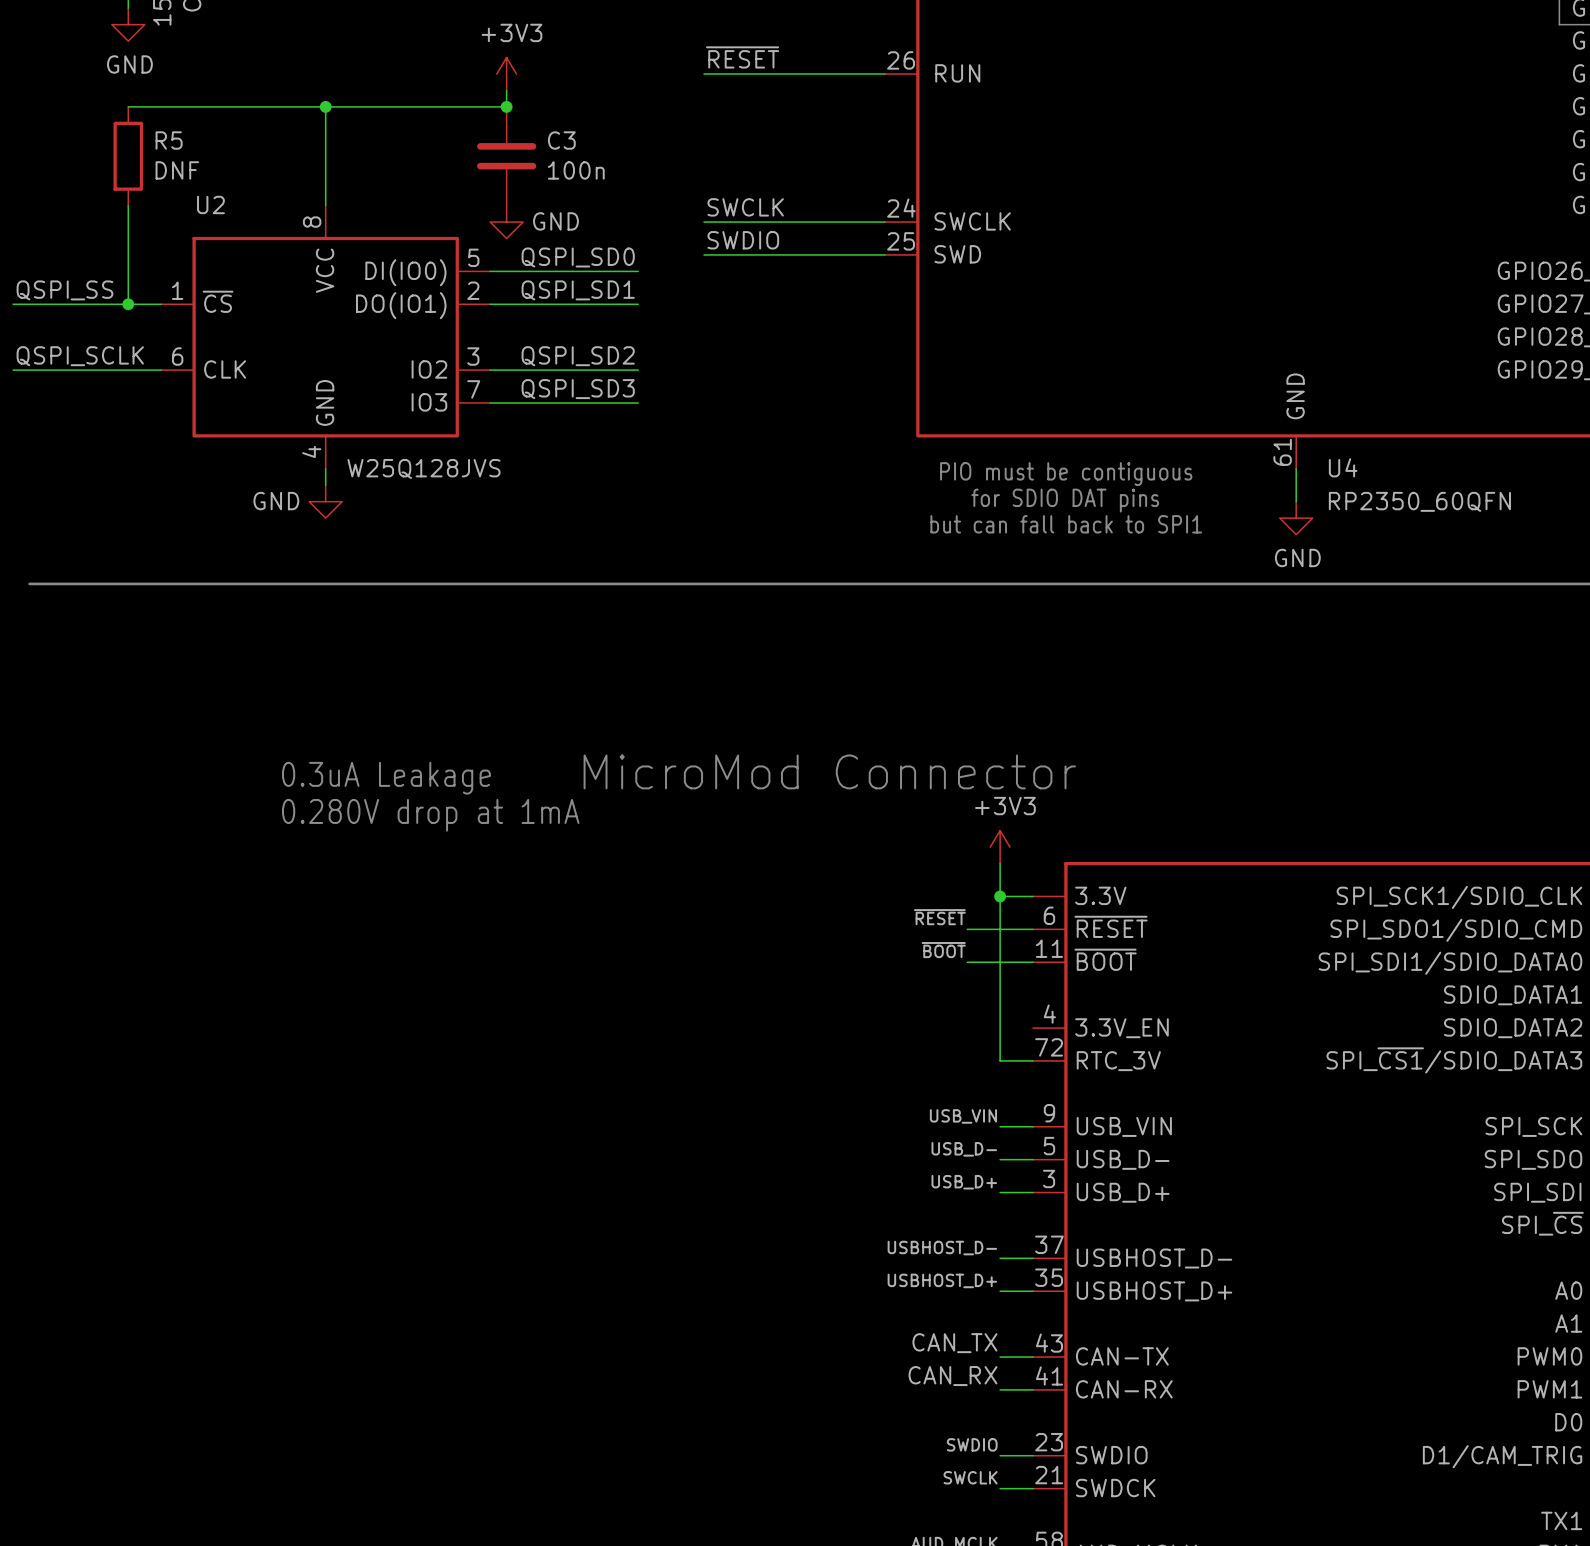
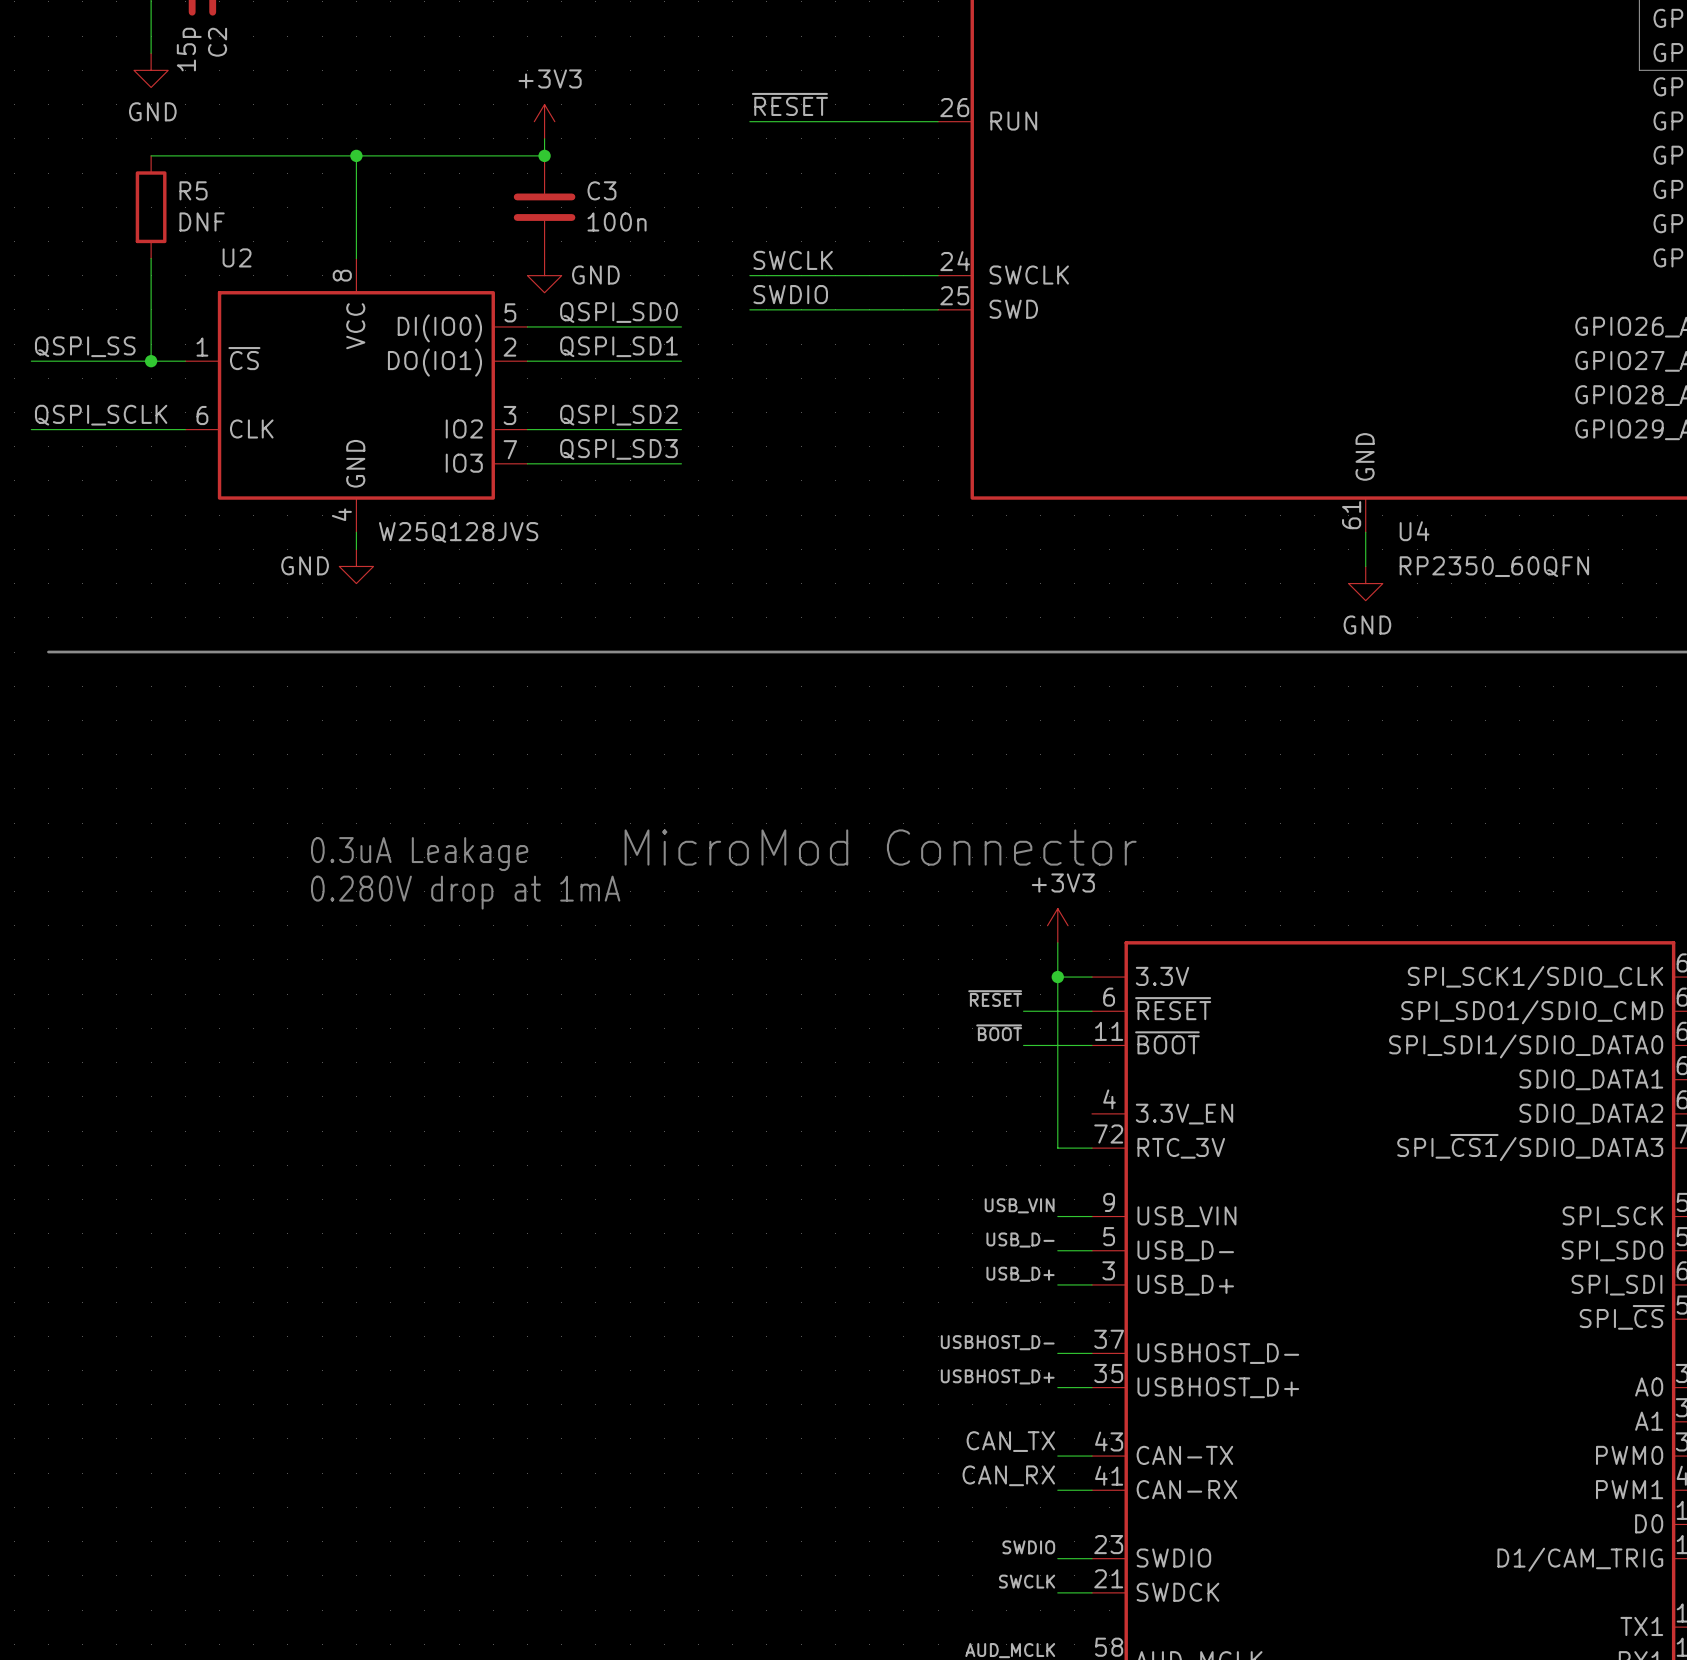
text: PIO must be contiguous (1066, 474) -> none
text: for SDIO DAT pins (1065, 500) -> none
text: but can fall back to SPI1 (1066, 524) -> none

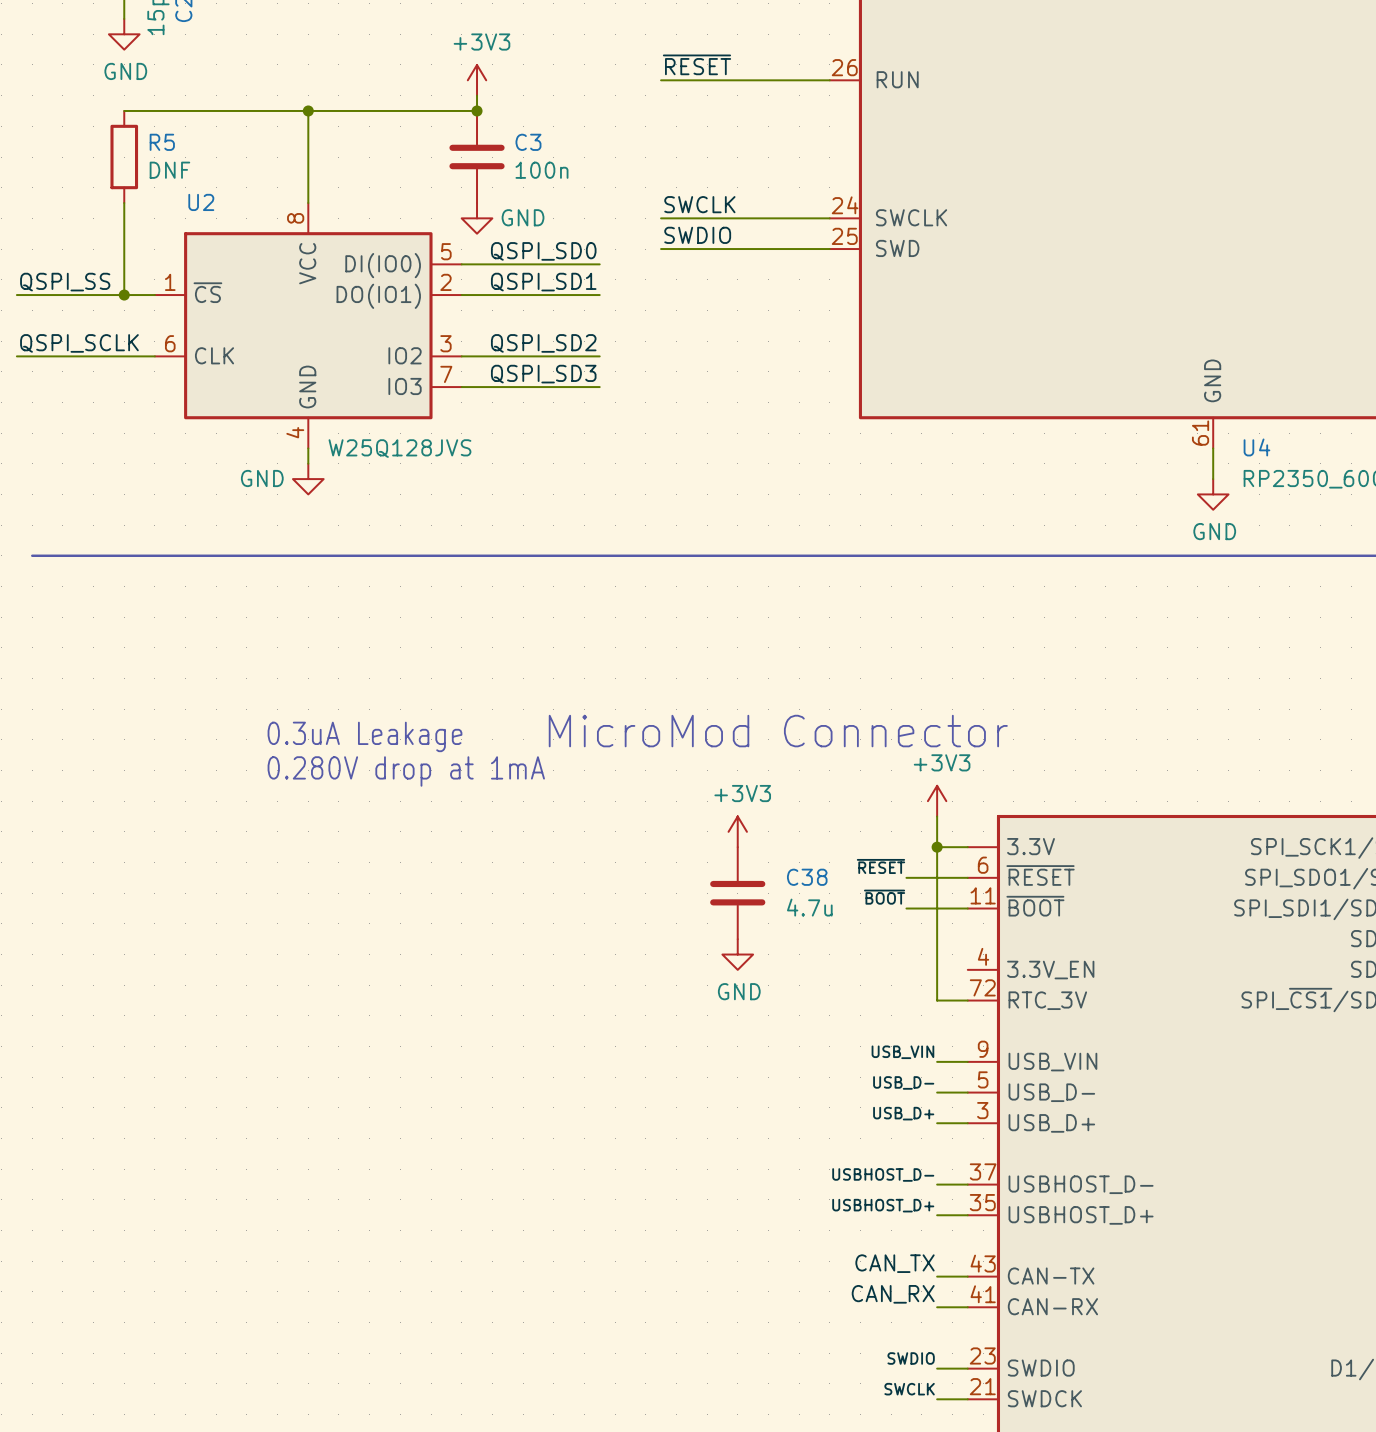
power symbol: none -> +3V3 (737, 831)
C38: none -> 4.7u (737, 893)
power symbol: none -> GND (737, 954)

